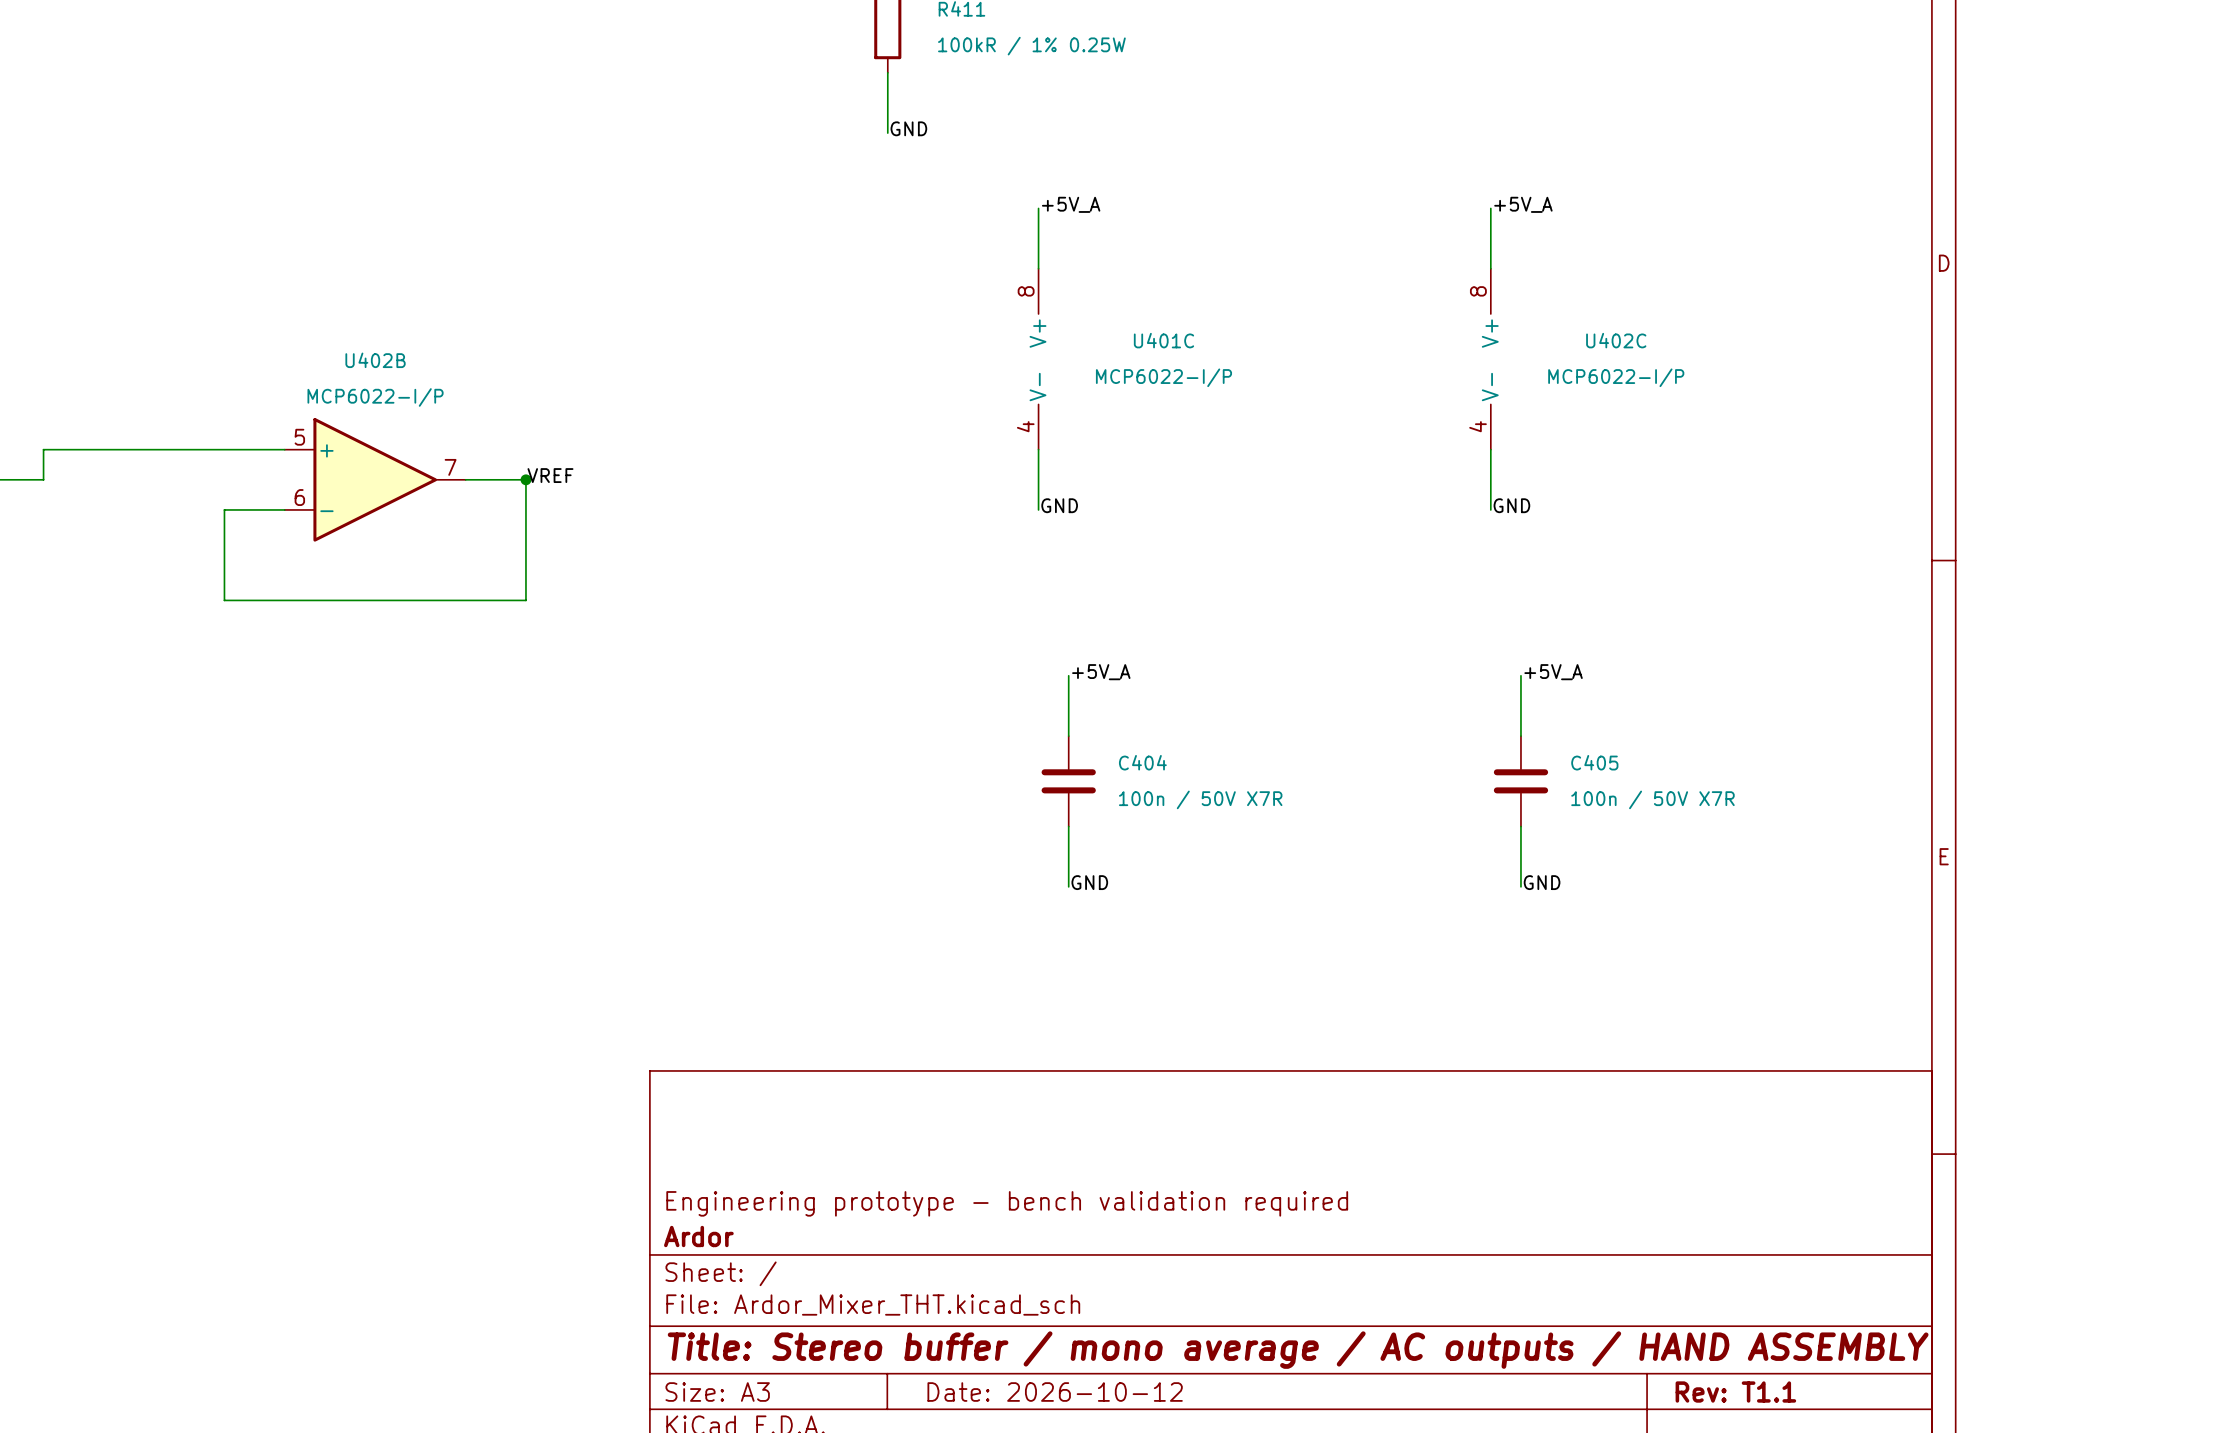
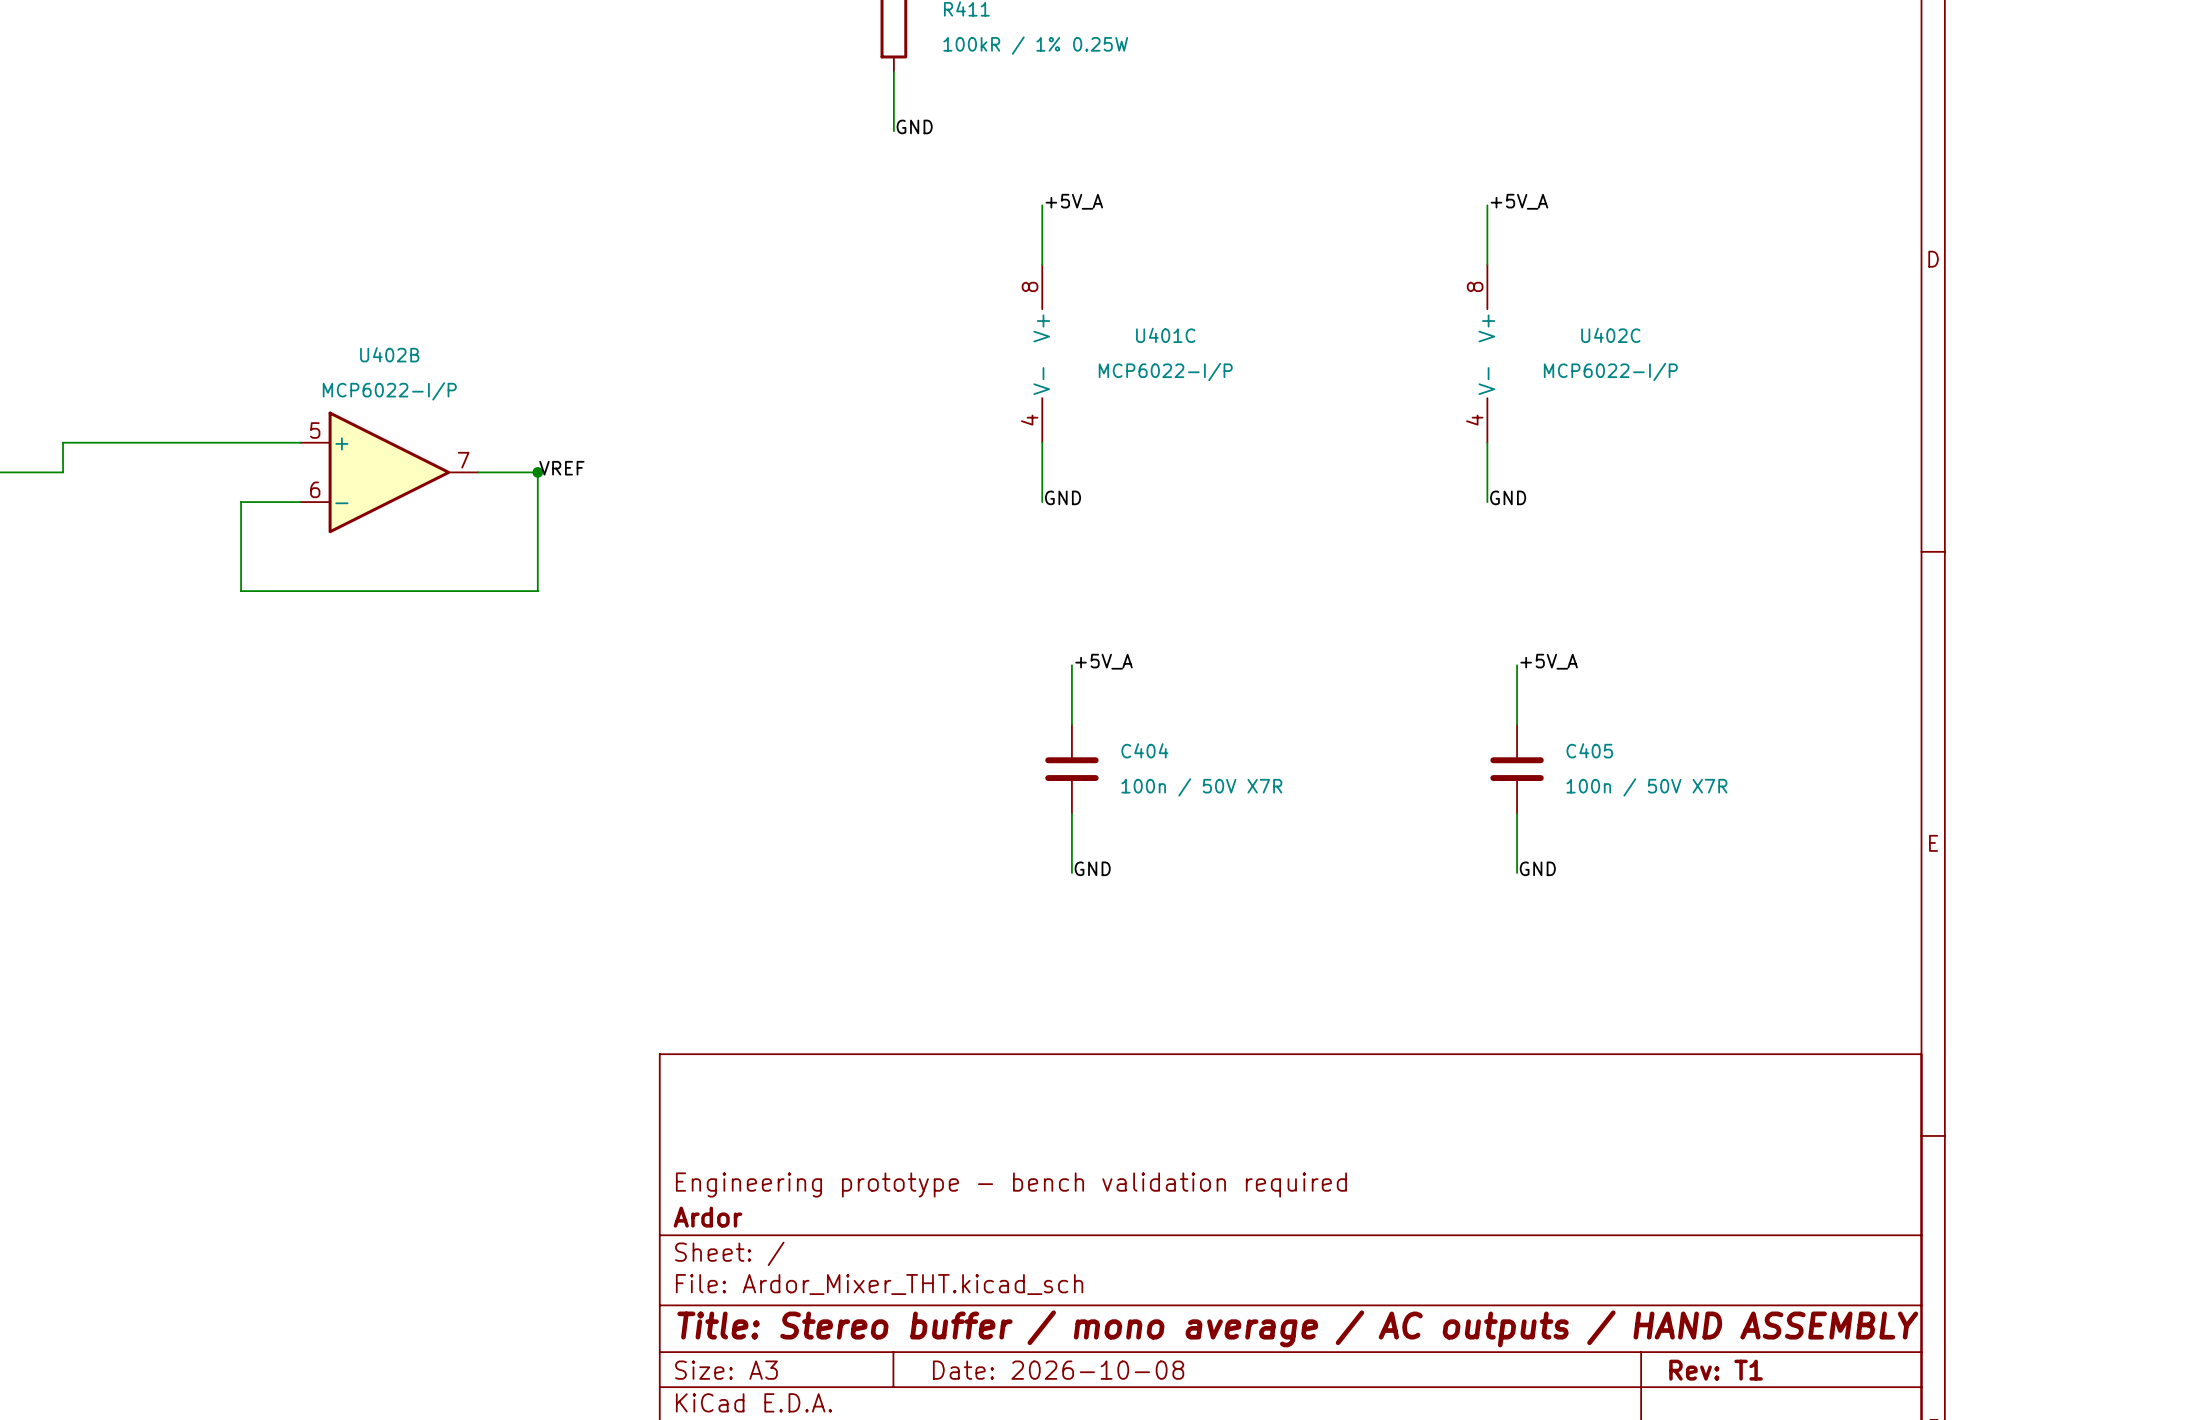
title block: Date: 2026-10-12 (1055, 1392) -> Date: 2026-10-08 (1058, 1370)
title block: Rev: T1.1 (1735, 1392) -> Rev: T1 (1716, 1370)

